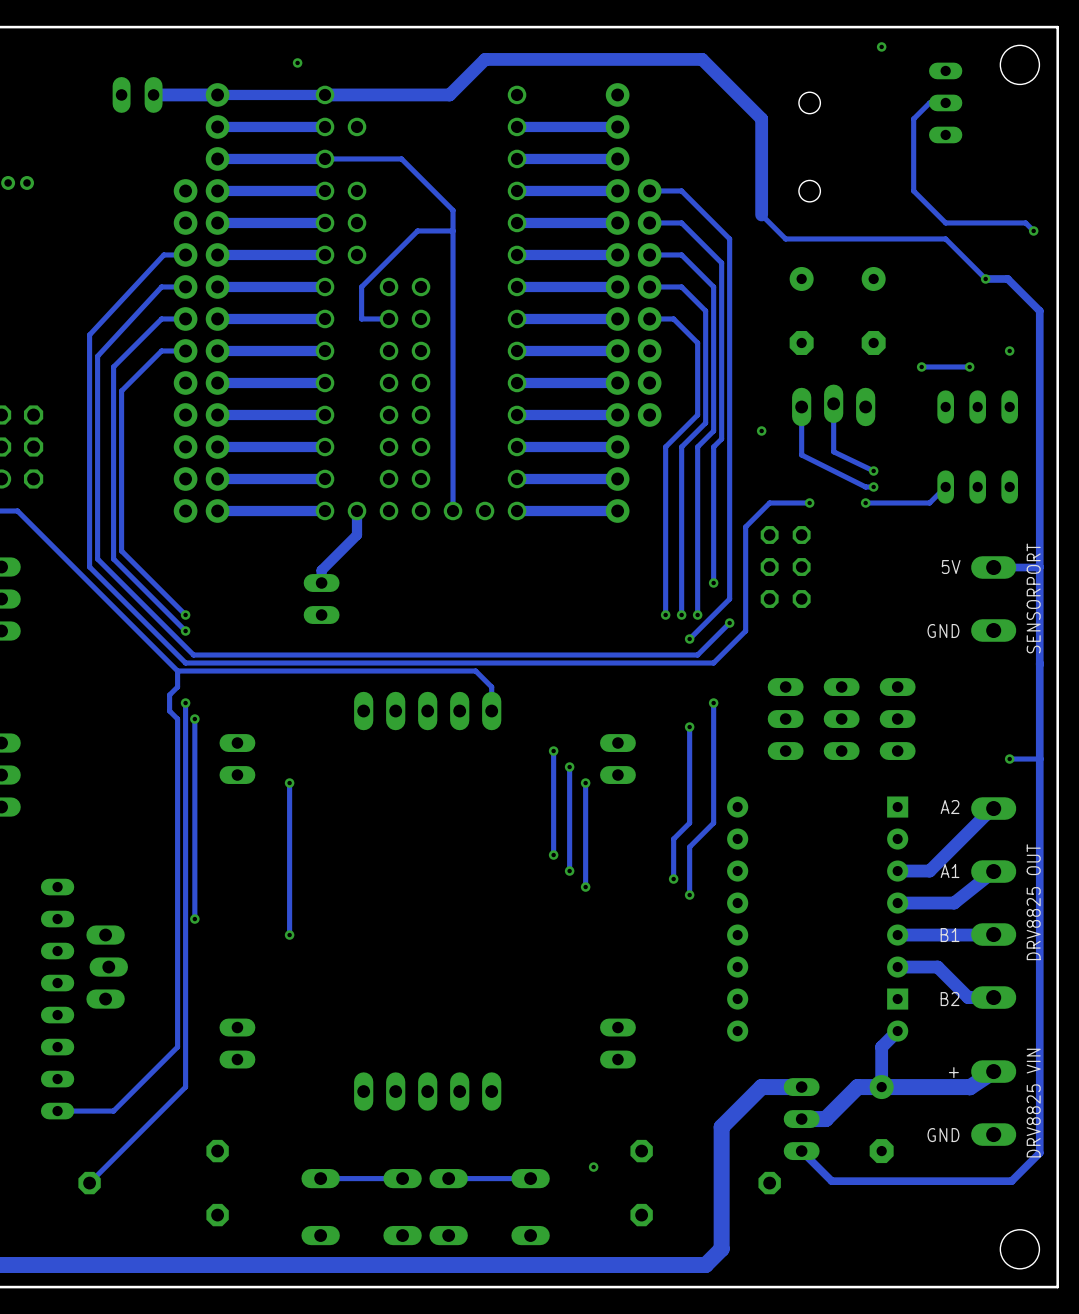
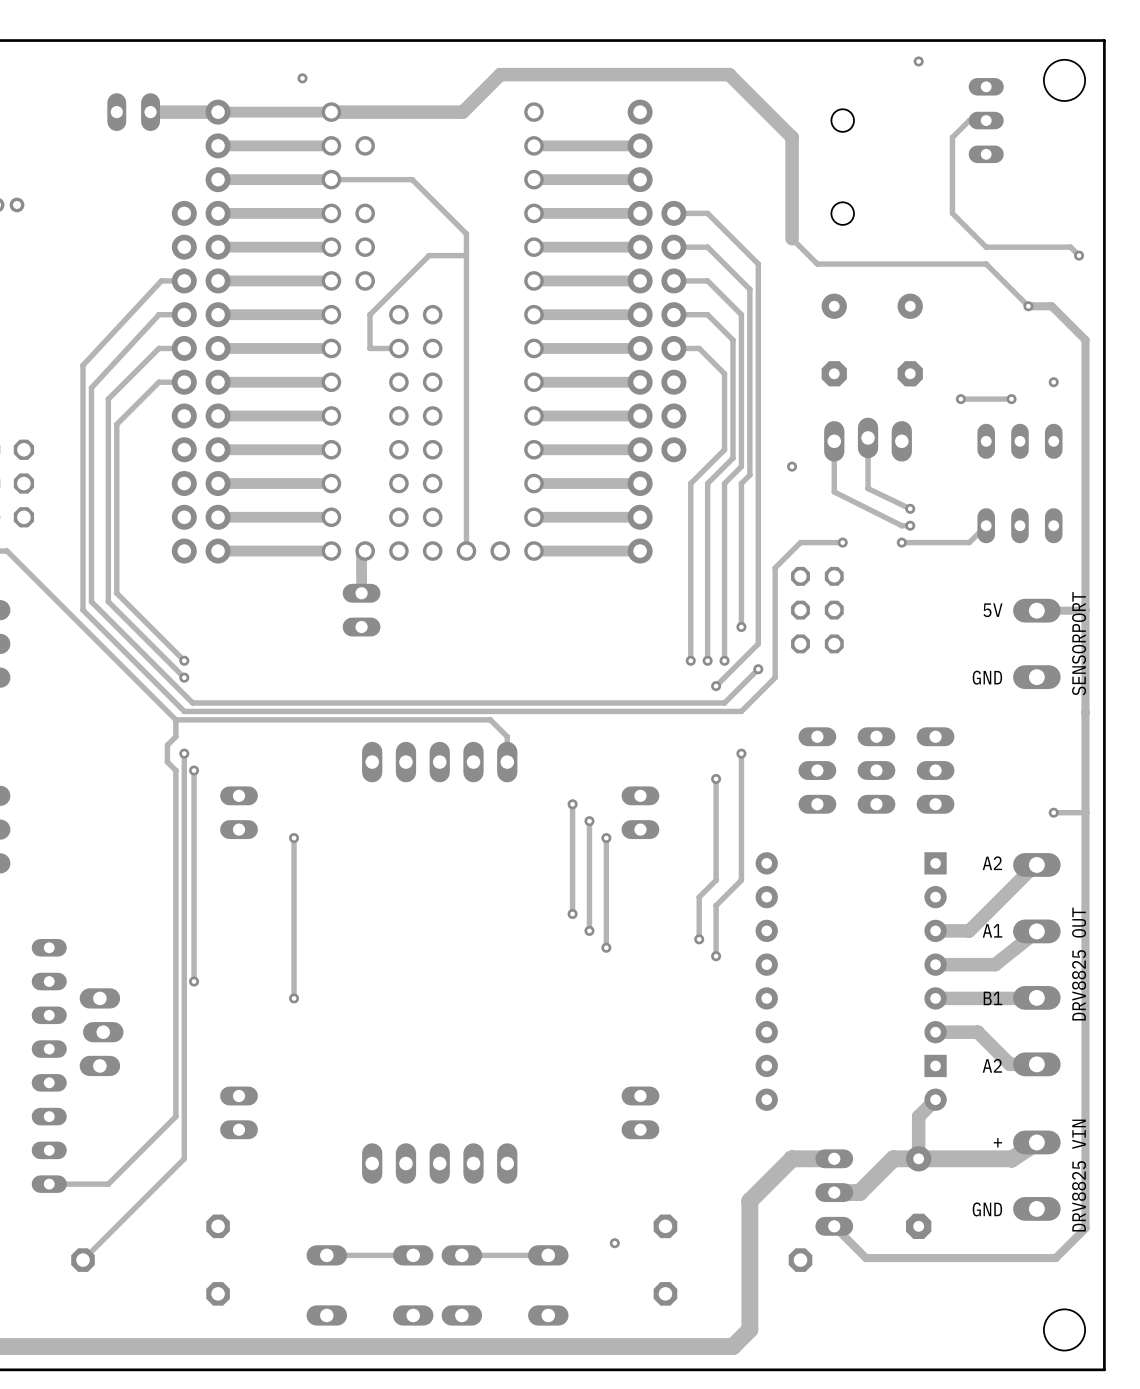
track: (357, 511) (357, 535) (321, 570) (321, 583) -> (365, 551) (361, 554) (361, 593)
part position: (321, 599) -> (361, 610)
text: B2 (950, 999) -> A2 (992, 1065)

